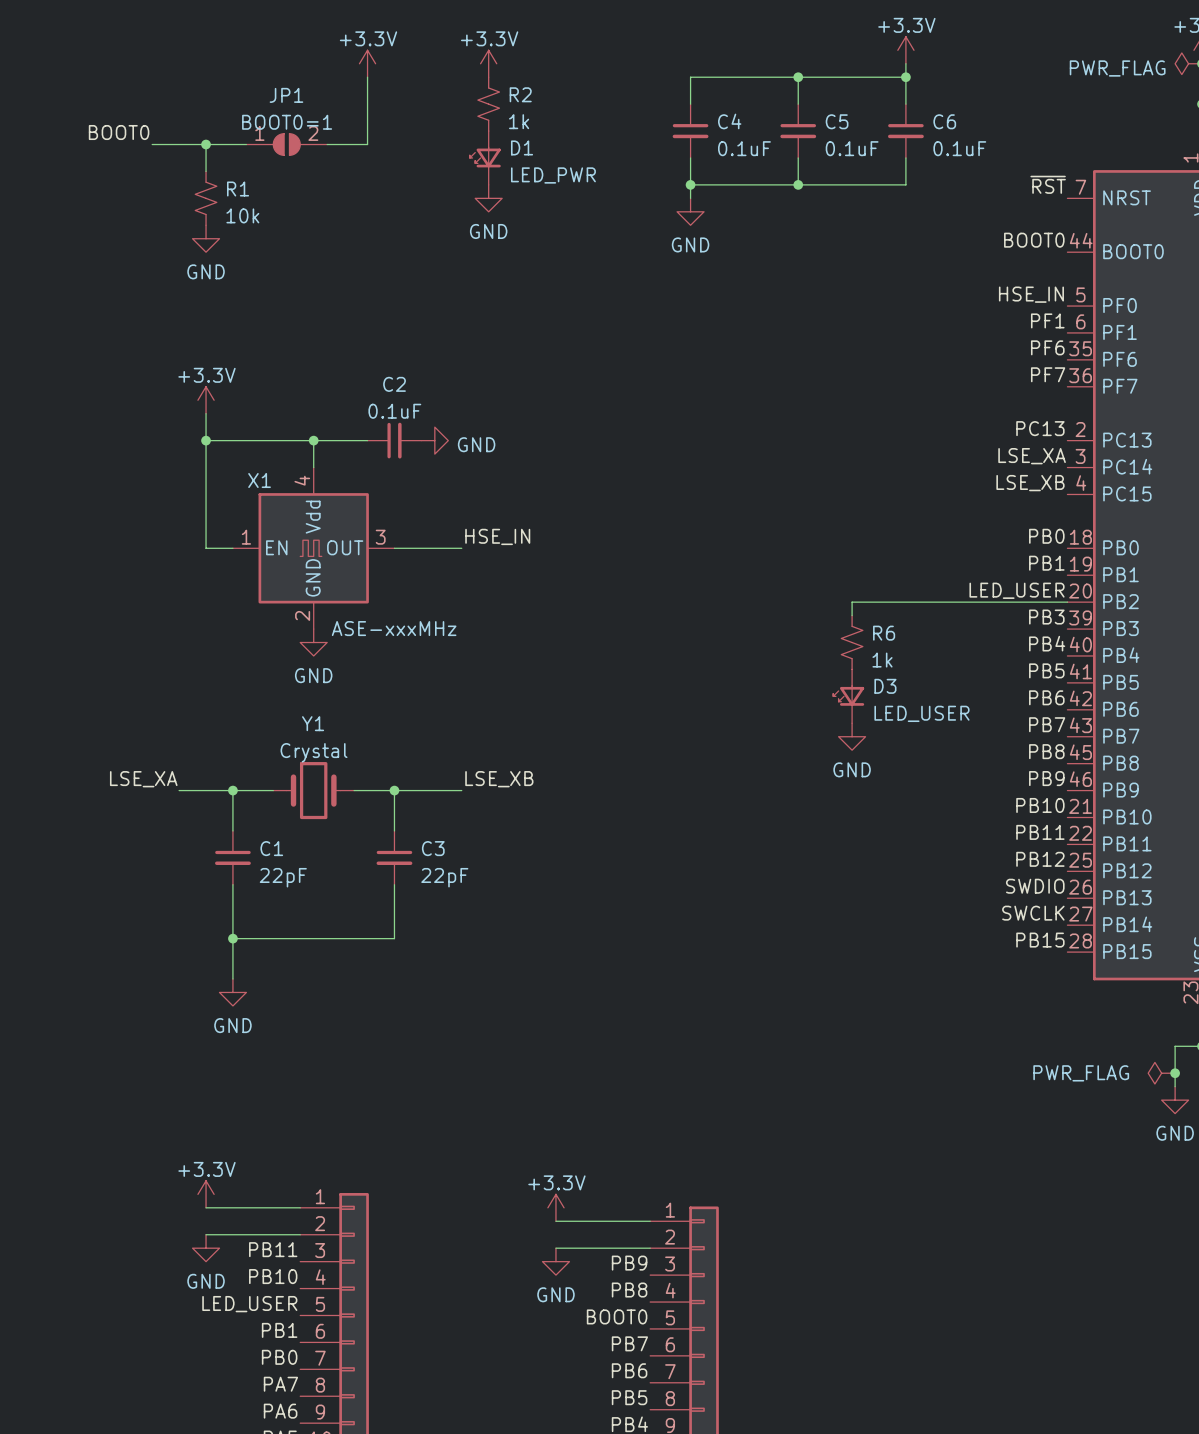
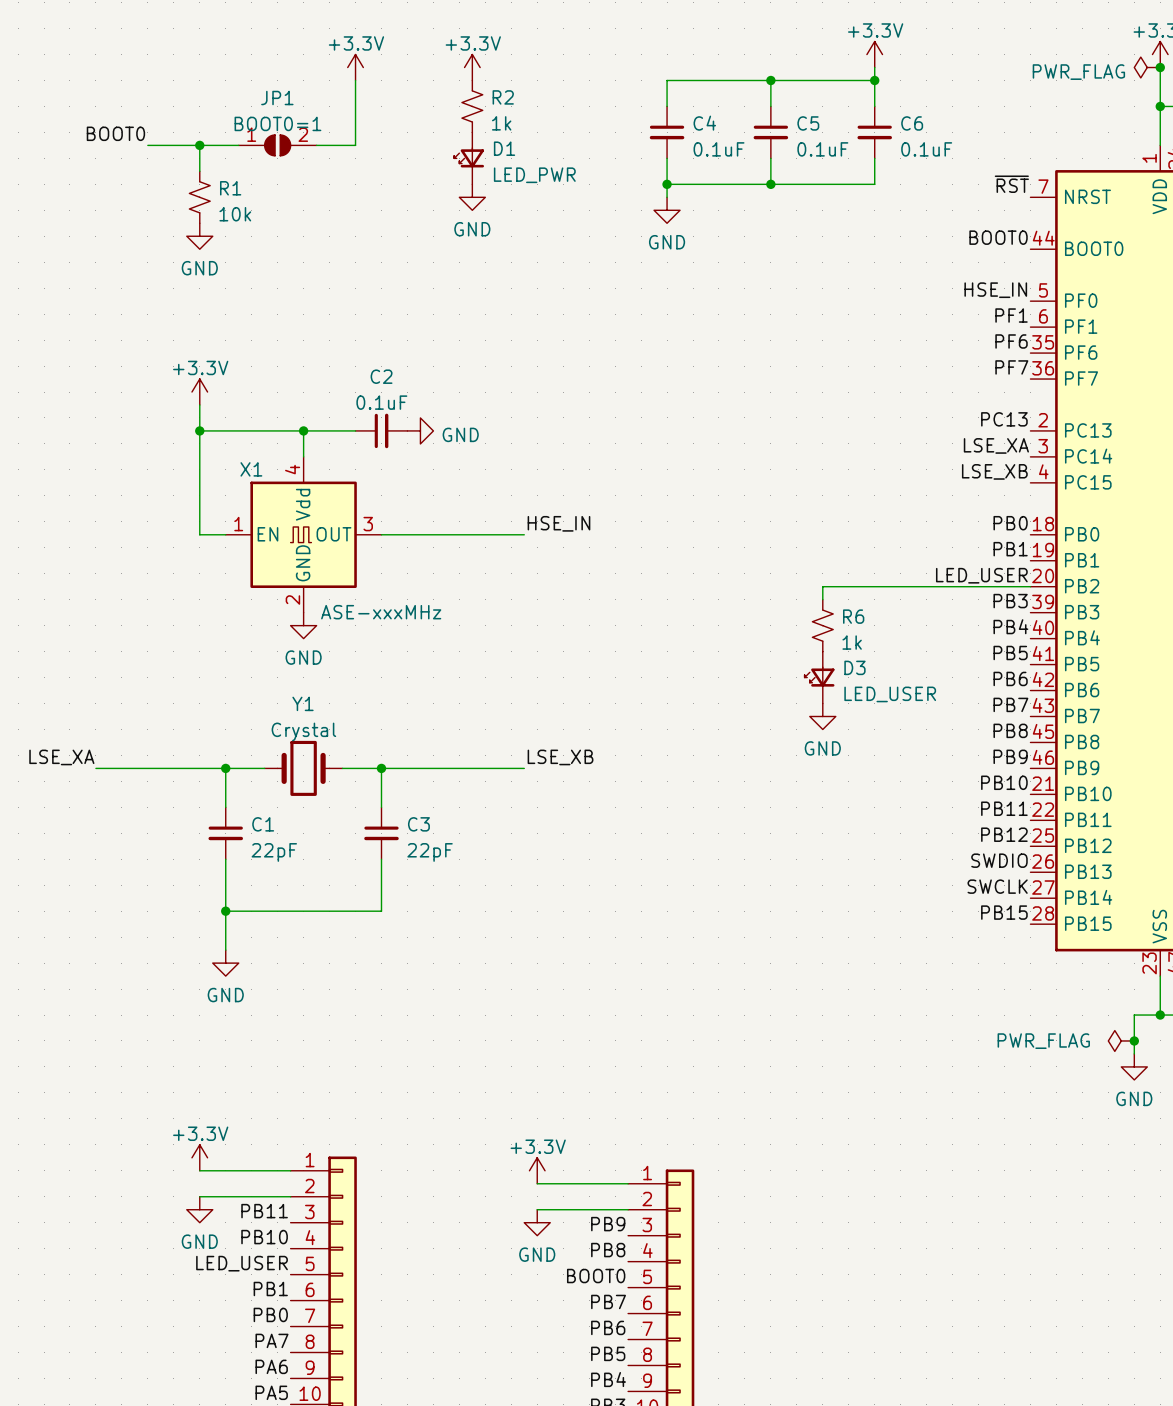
label position: HSE_IN (497, 536) -> HSE_IN (558, 523)
wire: none -> (446, 534) (524, 534)
label position: LSE_XA (143, 779) -> LSE_XA (61, 757)
label position: LSE_XB (499, 779) -> LSE_XB (560, 757)
wire: none -> (95, 768) (173, 768)
wire: none -> (446, 768) (524, 768)

